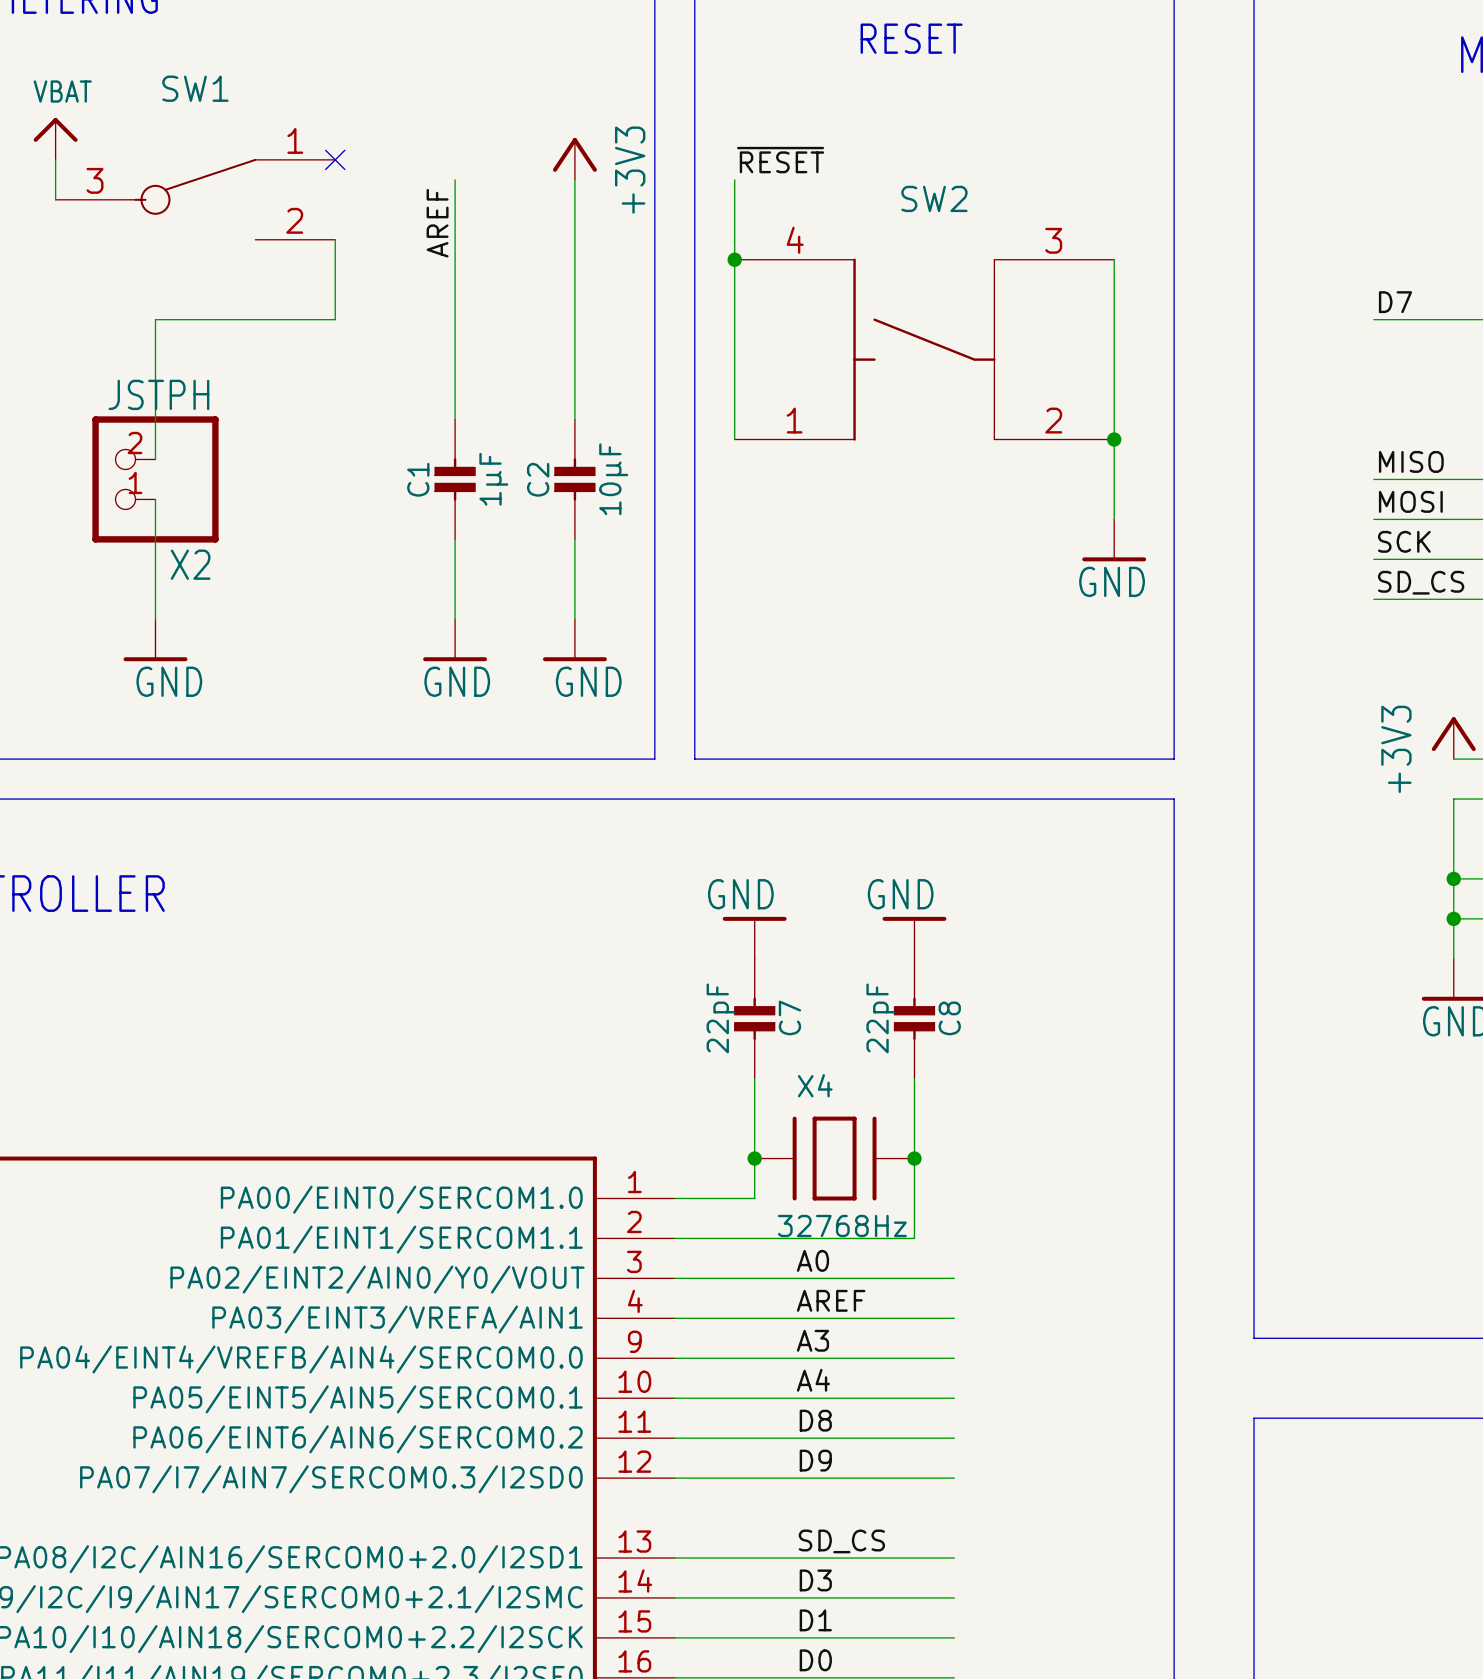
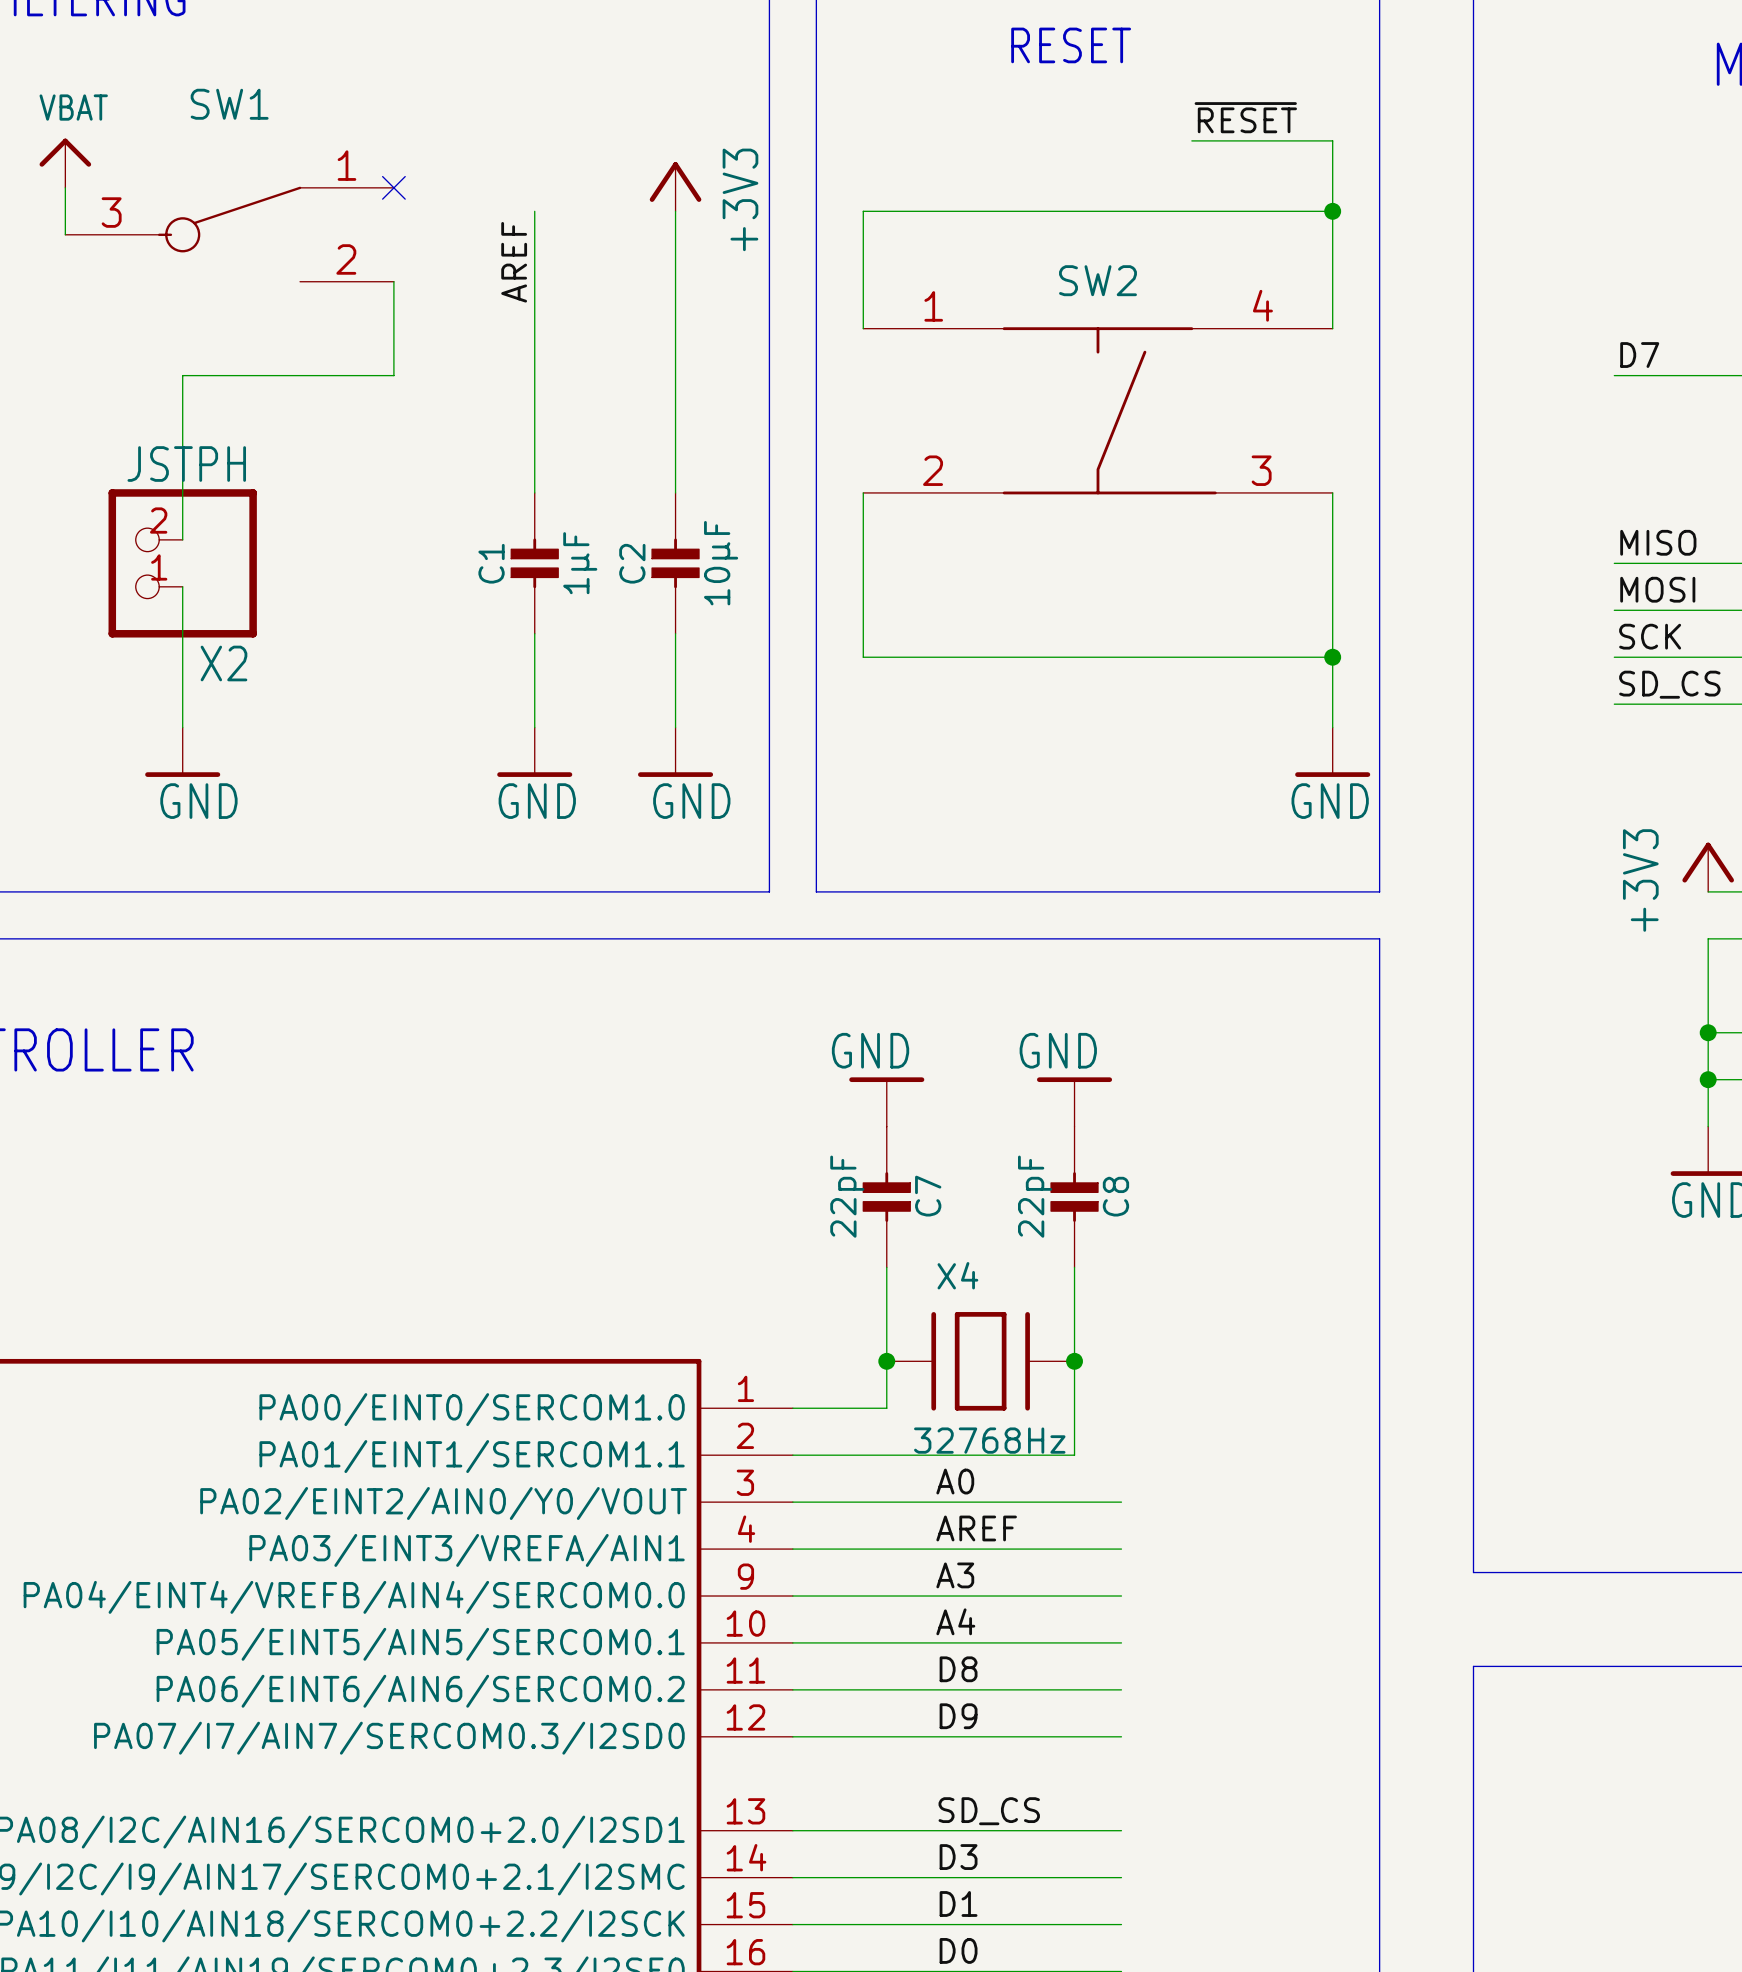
wire: none -> (1191, 140) (1332, 140) (1332, 328)
label position: ~{RESET} (780, 160) -> ~{RESET} (1245, 117)
wire: none -> (863, 211) (1332, 211)
junction: none -> (1332, 211)
SW2 name position: SW2 (934, 198) -> SW2 (1097, 280)
SW2 symbol: [734, 258, 1115, 441] -> [863, 327, 1333, 495]
junction: (734, 259) -> none
wire: (1114, 259) (1114, 519) -> none
wire: (734, 279) (734, 419) -> none
wire: none -> (1332, 492) (1332, 727)
wire: none -> (863, 516) (863, 657) (1332, 657)
junction: (1114, 439) -> none
power symbol position: GND (1114, 540) -> GND (1332, 752)
junction: none -> (1332, 657)

